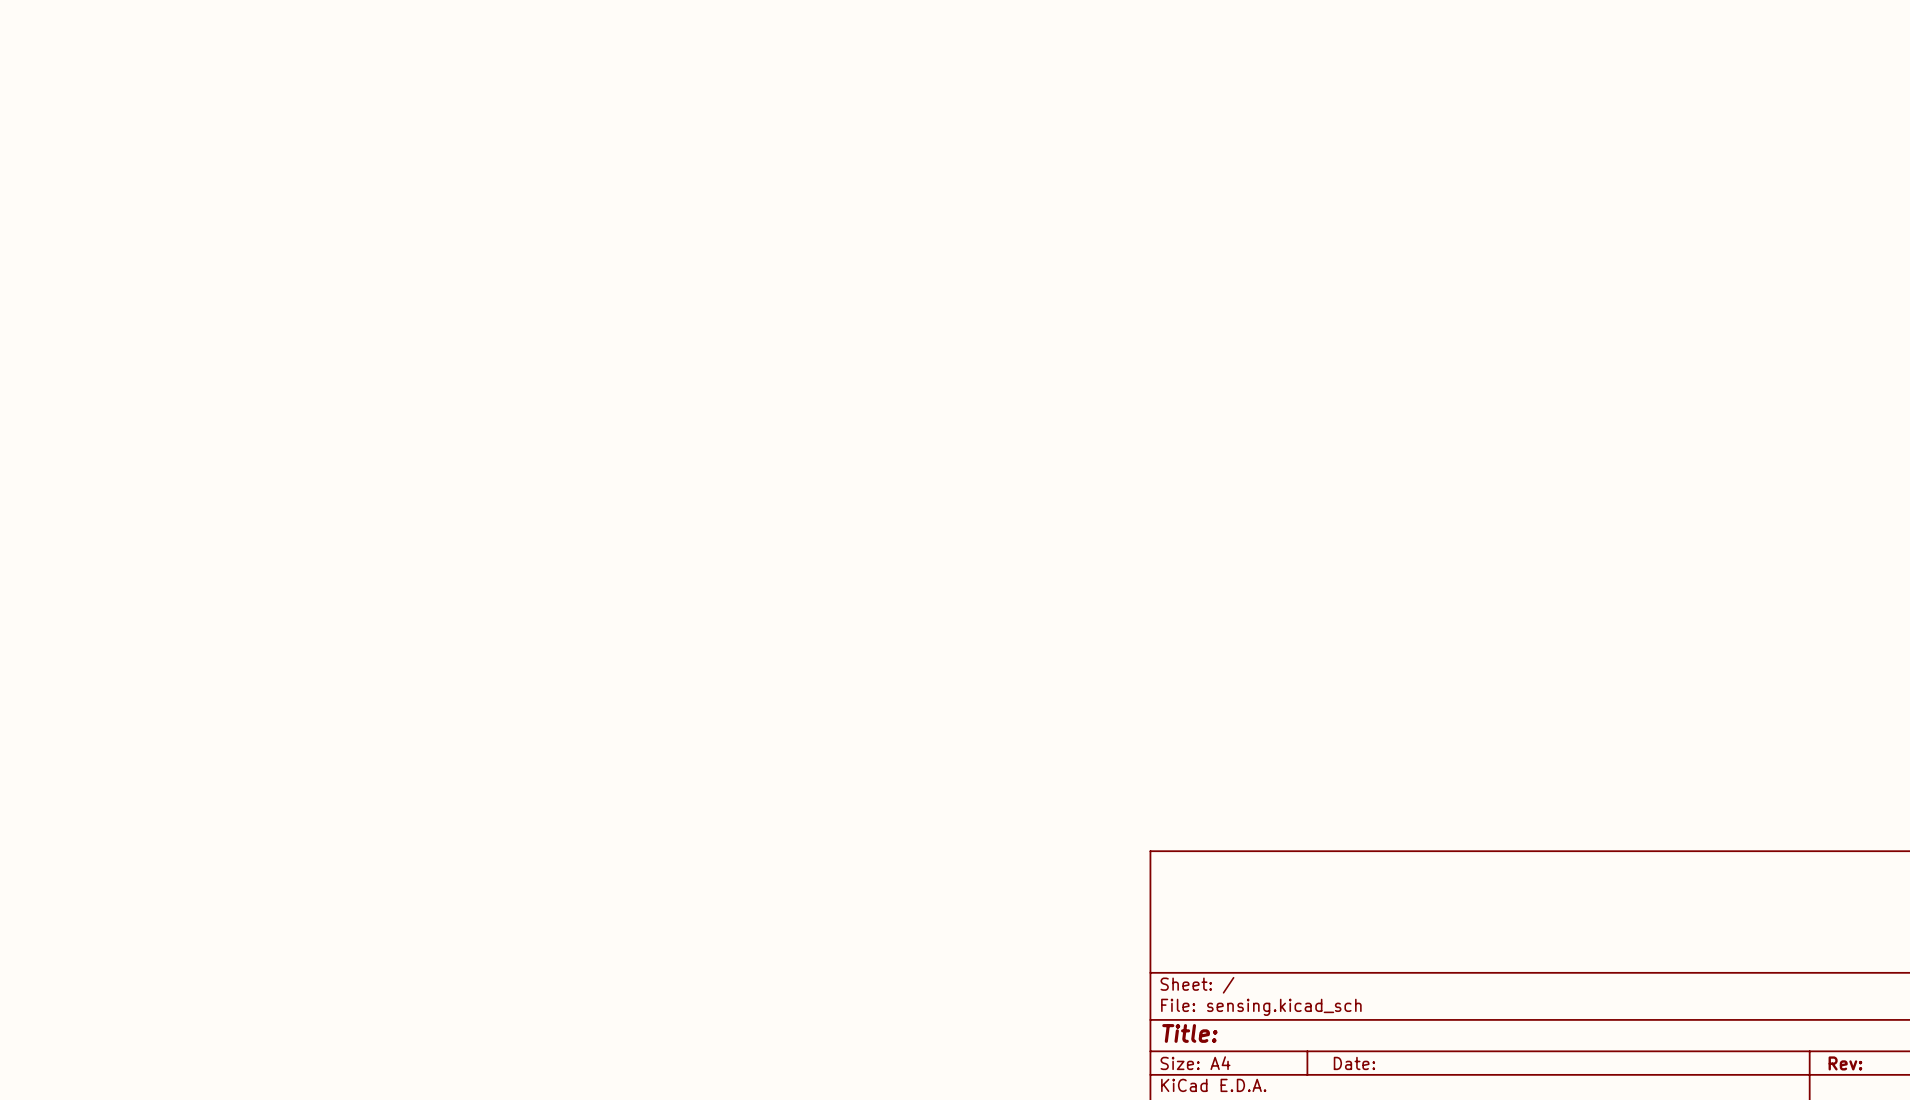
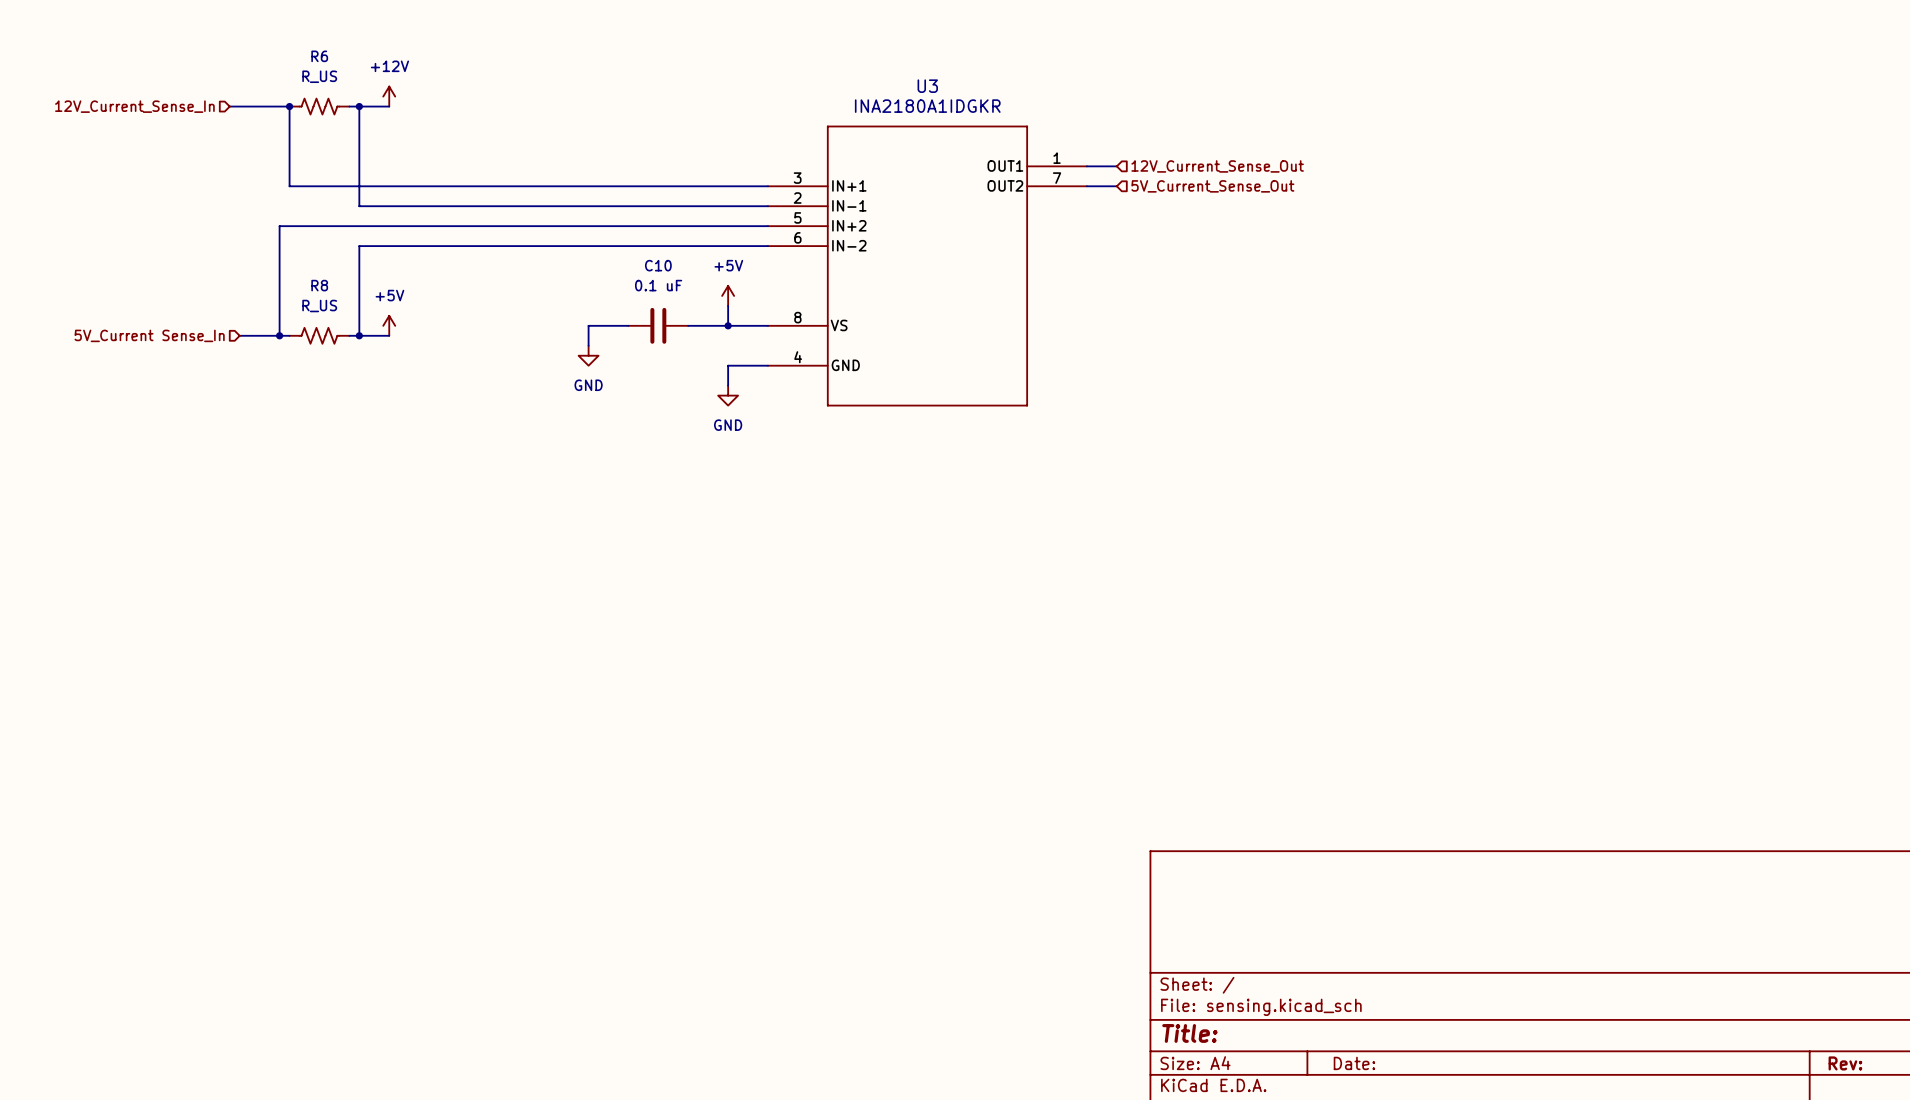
power symbol: none -> +12V (389, 96)
hierarchical label: none -> 12V_Current_Sense_In (134, 106)
wire: none -> (229, 106) (289, 106) (289, 186) (767, 186)
junction: none -> (289, 106)
R6: none -> R_US (319, 106)
wire: none -> (349, 106) (389, 106)
wire: none -> (359, 106) (359, 206) (767, 206)
junction: none -> (359, 106)
wire: none -> (1086, 166) (1116, 166)
hierarchical label: none -> 12V_Current_Sense_Out (1217, 166)
wire: none -> (1086, 186) (1116, 186)
hierarchical label: none -> 5V_Current_Sense_Out (1212, 186)
wire: none -> (767, 226) (279, 226) (279, 335)
wire: none -> (767, 246) (359, 246) (359, 335)
U3: none -> INA2180A1IDGKR (927, 266)
power symbol: none -> +5V (728, 295)
wire: none -> (728, 305) (728, 325)
power symbol: none -> +5V (389, 325)
wire: none -> (628, 325) (588, 325) (588, 345)
C10: none -> 0.1 uF (658, 325)
wire: none -> (688, 325) (767, 325)
junction: none -> (728, 325)
hierarchical label: none -> 5V_Current Sense_In (149, 335)
wire: none -> (239, 335) (289, 335)
junction: none -> (279, 335)
R8: none -> R_US (319, 335)
wire: none -> (349, 335) (389, 335)
junction: none -> (359, 335)
power symbol: none -> GND (588, 355)
wire: none -> (767, 365) (728, 365) (728, 385)
power symbol: none -> GND (728, 395)

